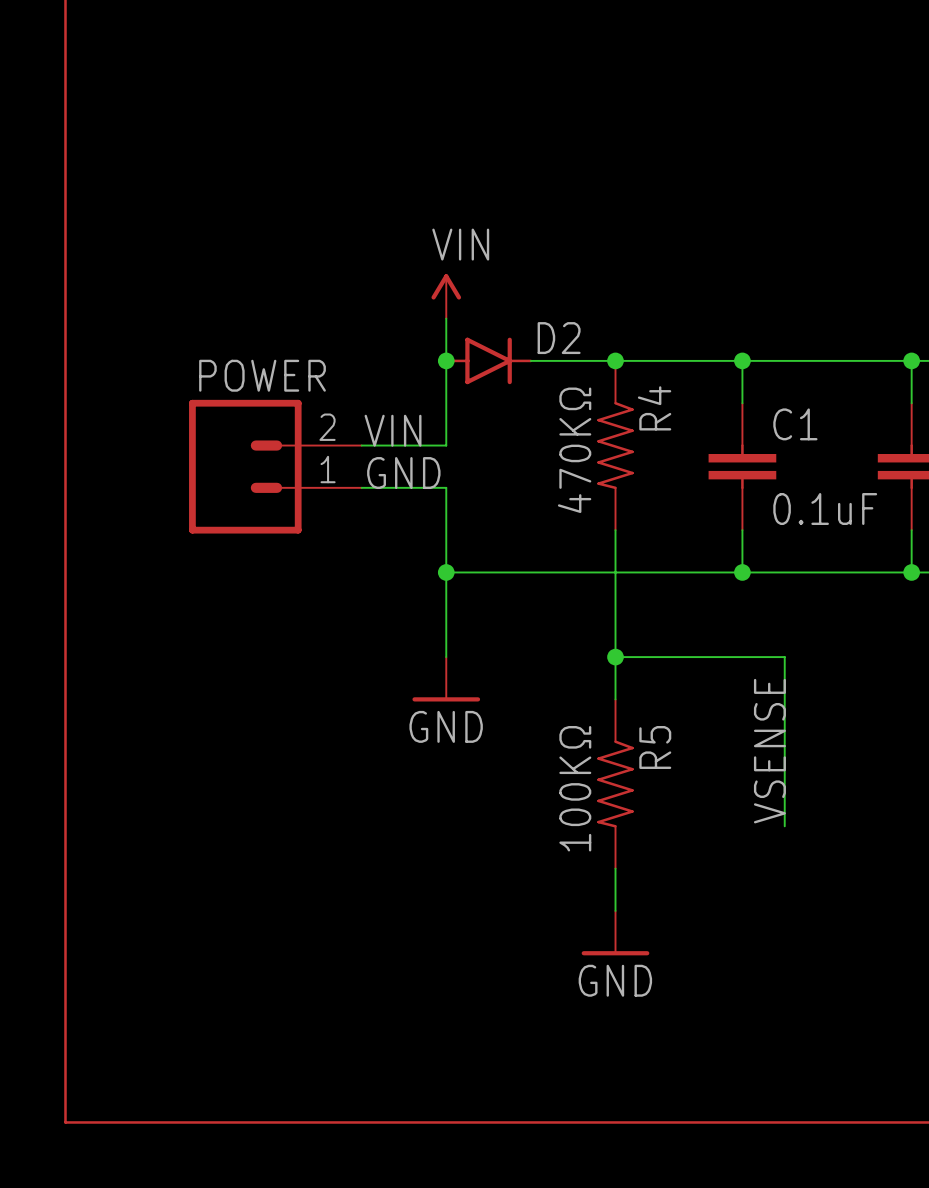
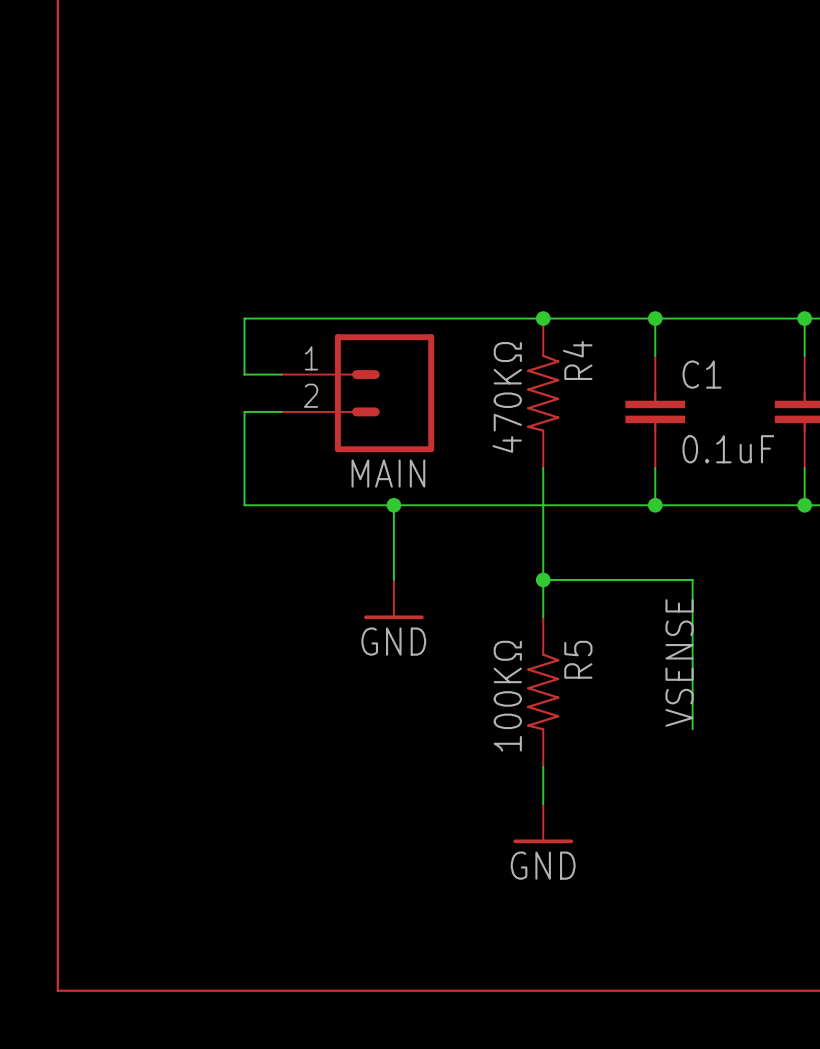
power symbol: VIN (446, 296) -> none
wire: (446, 318) (446, 445) (361, 445) -> none
junction: (446, 360) -> none
D2: (488, 360) -> none
wire: none -> (468, 318) (244, 318) (244, 374) (281, 374)
label: VIN (393, 430) -> none
MAIN: none -> (358, 393)
POWER: (275, 466) -> none
label: GND (403, 473) -> none
wire: (361, 487) (446, 487) (446, 572) -> (281, 411) (244, 411) (244, 505) (393, 505)

